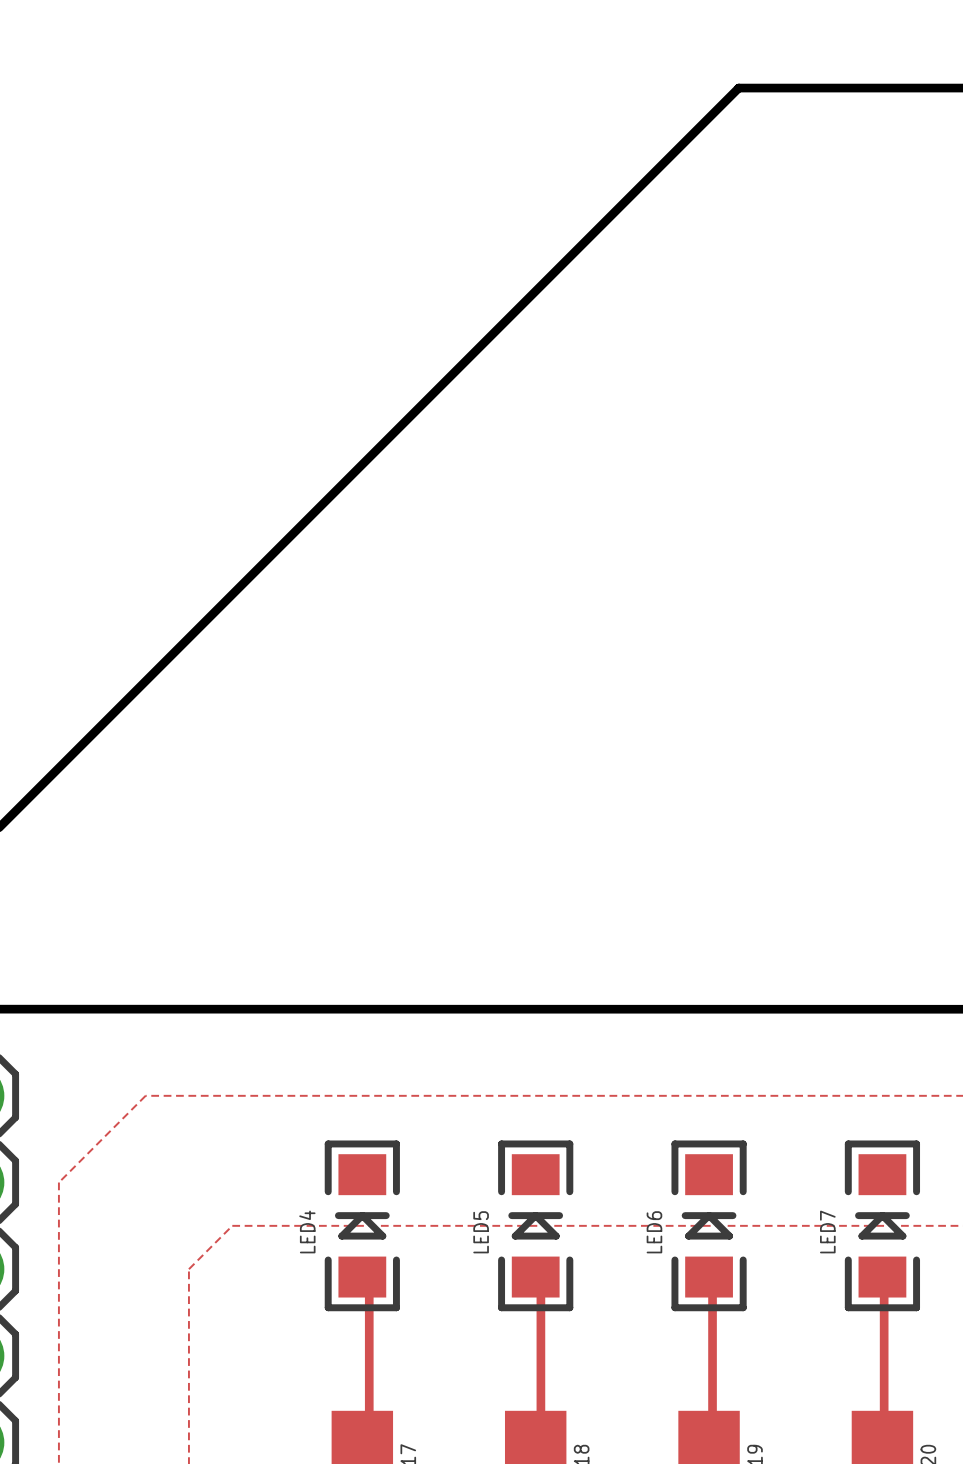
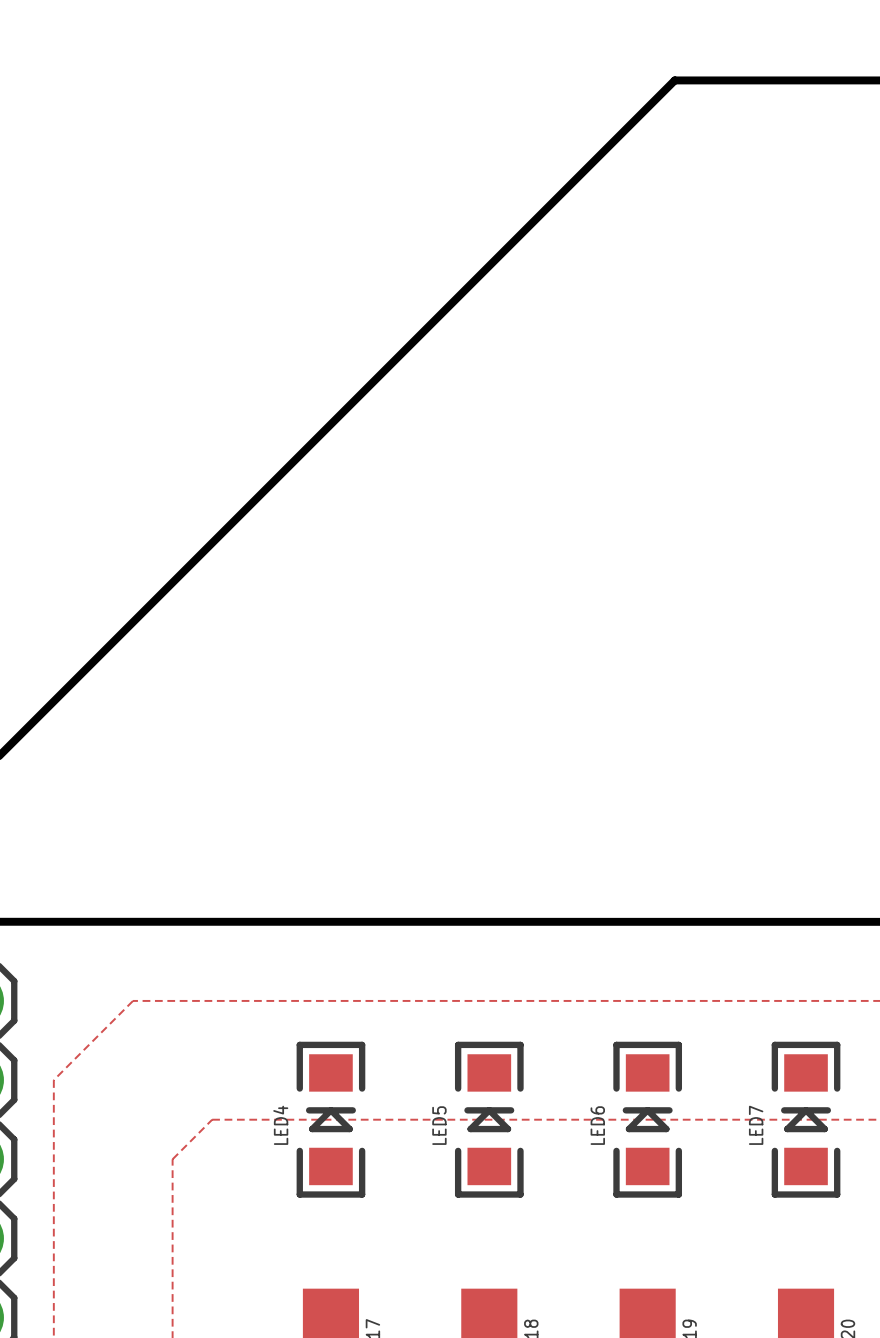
track: (362, 1277) (369, 1282) (369, 1430) (362, 1438) -> none
track: (535, 1277) (540, 1282) (540, 1430) (535, 1438) -> none
track: (709, 1277) (712, 1282) (712, 1430) (709, 1438) -> none
track: (882, 1277) (884, 1282) (884, 1430) (882, 1438) -> none

